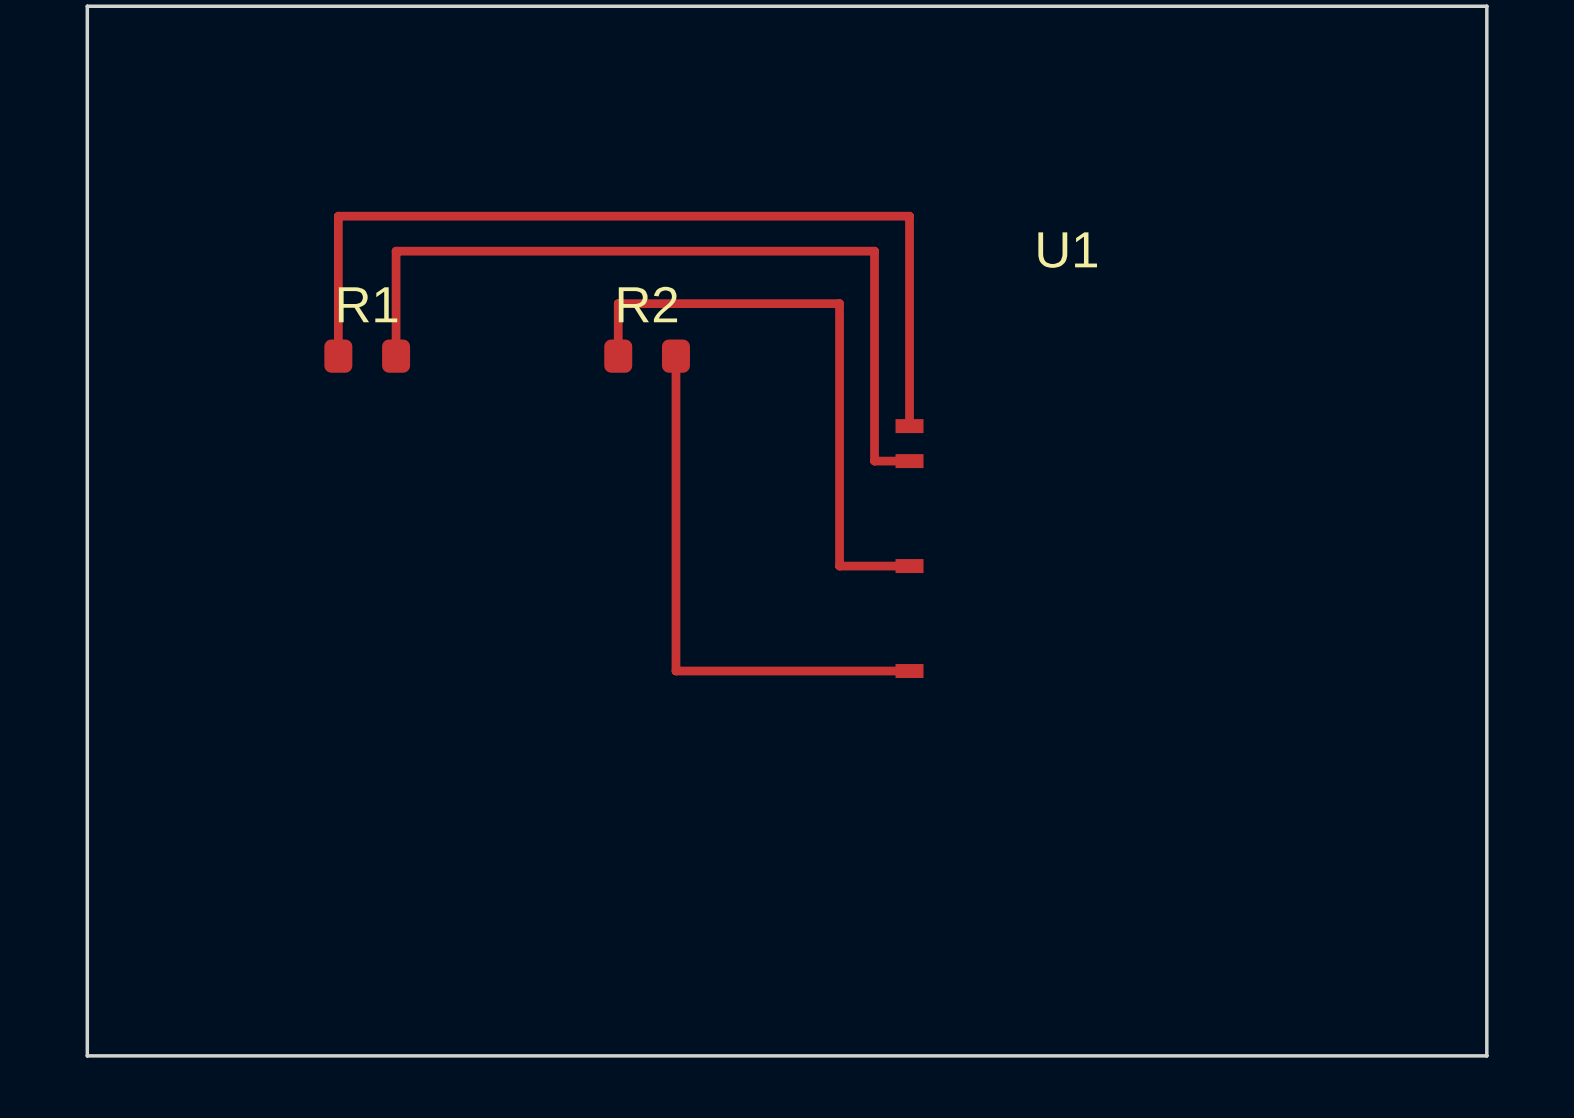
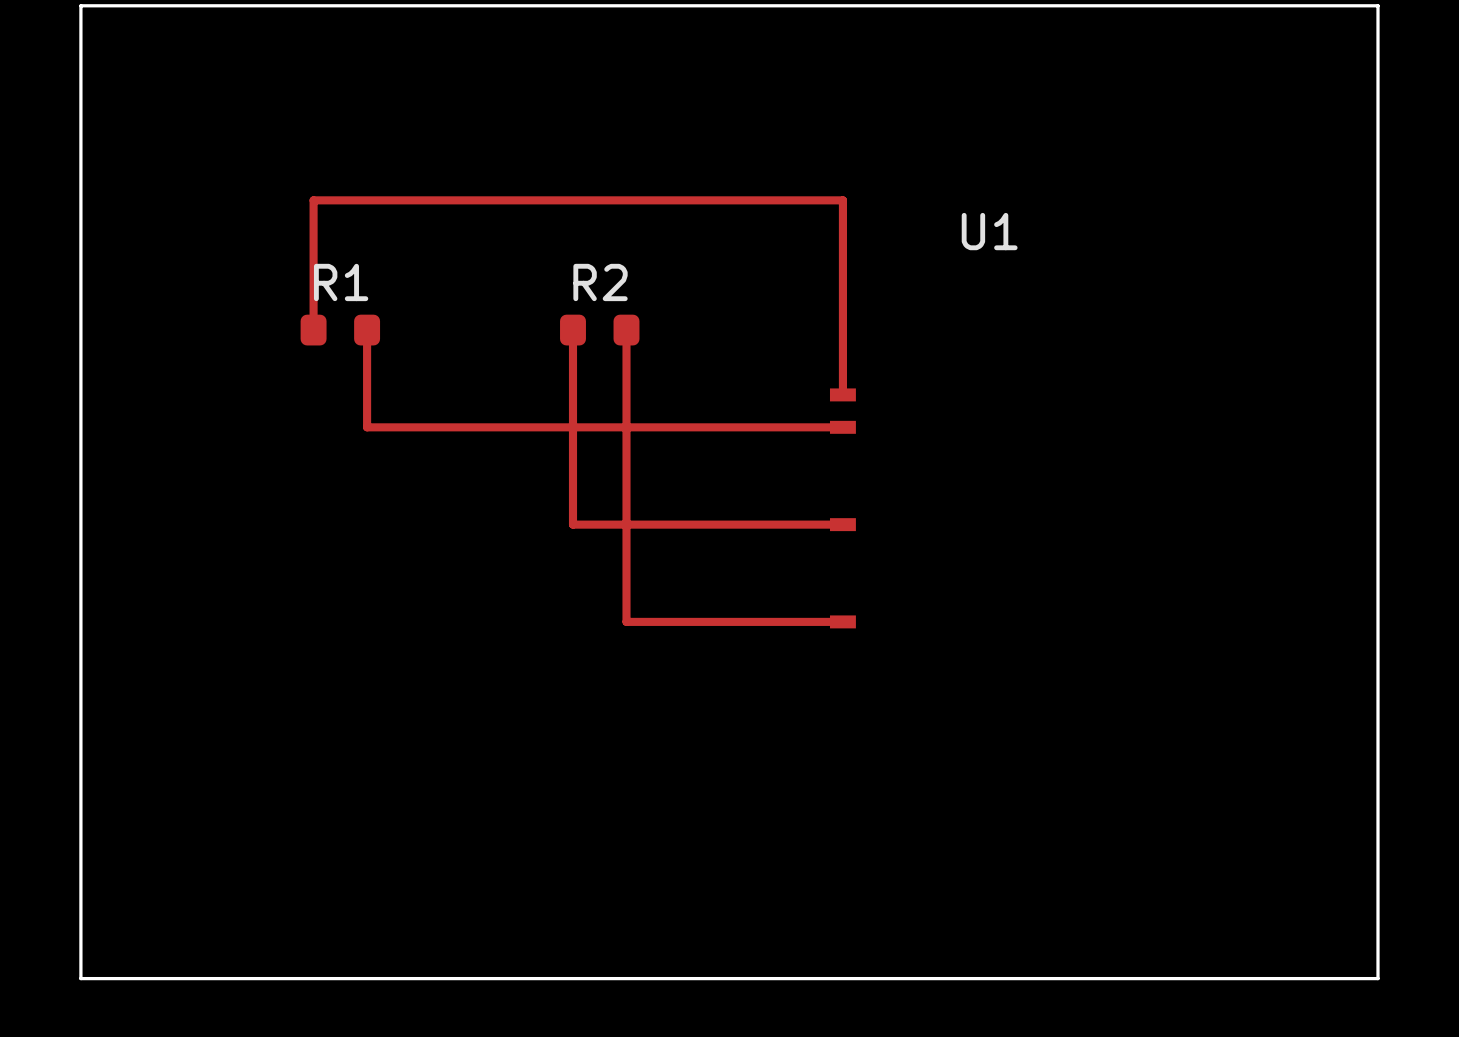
track: (396, 356) (396, 251) (874, 251) (874, 461) -> (367, 330) (367, 427) (810, 427)
track: (618, 356) (618, 303) (839, 303) (839, 566) -> (572, 330) (572, 524) (778, 524)

